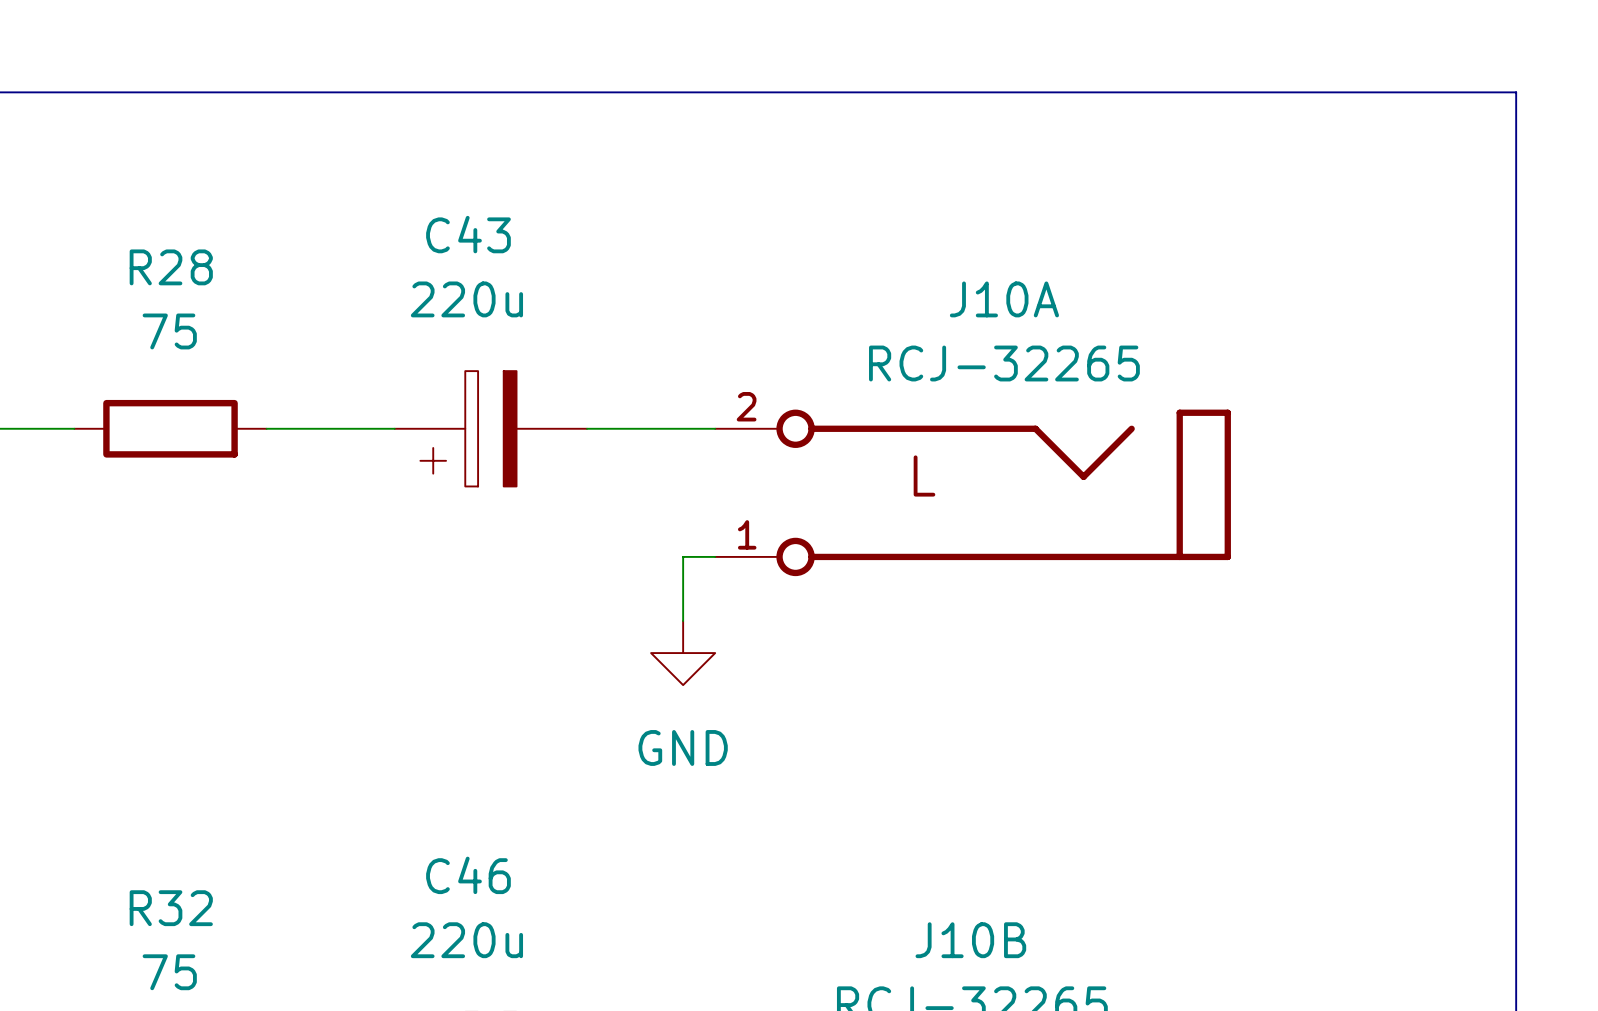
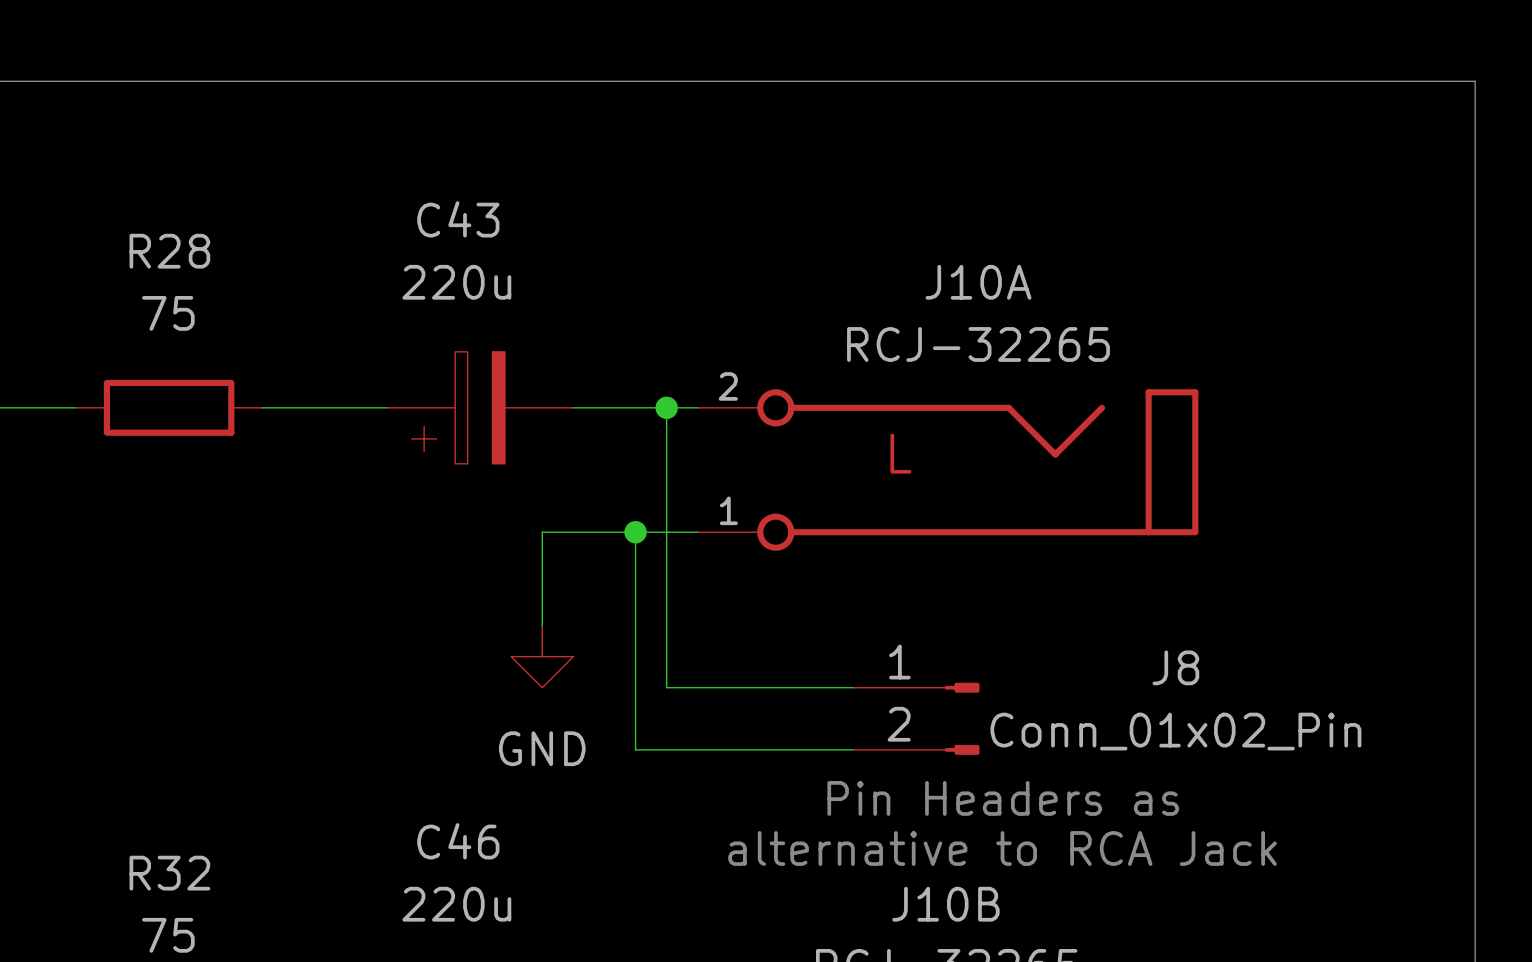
wire: none -> (666, 407) (666, 532) (542, 532) (542, 625)
junction: none -> (666, 407)
wire: none -> (635, 532) (635, 749) (853, 749)
junction: none -> (635, 532)
wire: none -> (666, 594) (666, 687) (853, 687)
power symbol position: GND (683, 653) -> GND (542, 656)
J8: none -> Conn_01x02_Pin (916, 718)
text: none -> Pin Headers as (1003, 798)
text: none -> alternative to RCA Jack (1002, 848)

